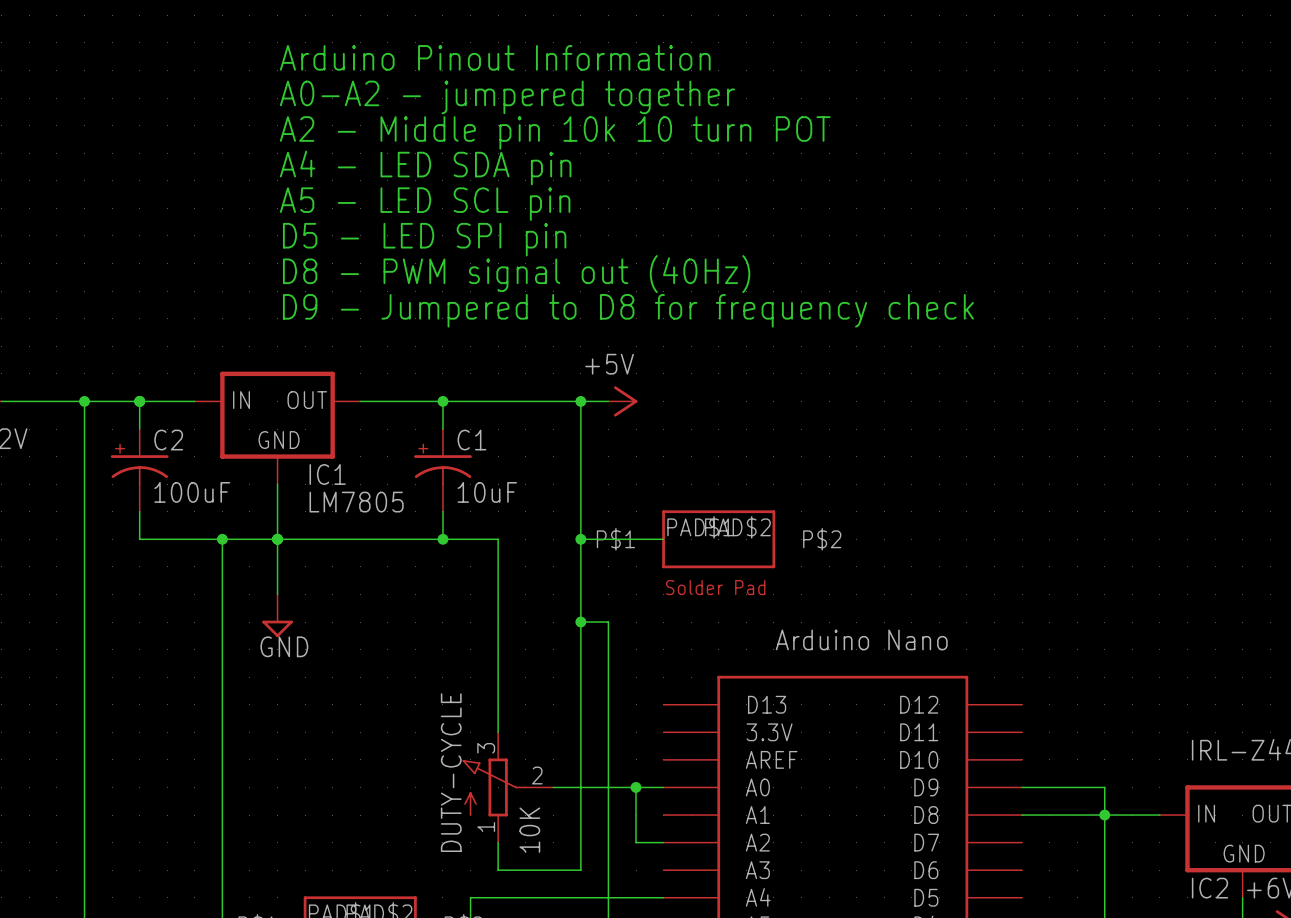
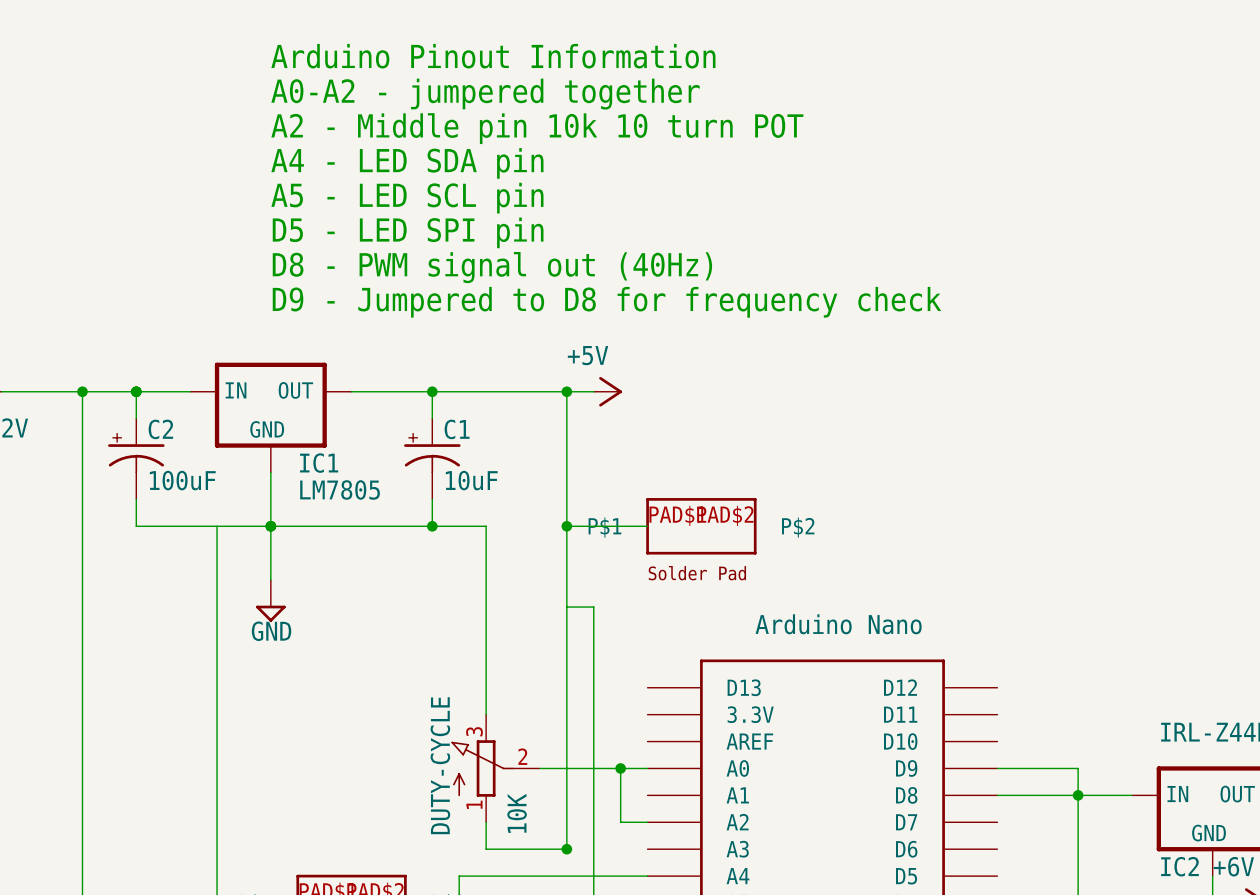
junction: (222, 539) -> none
junction: (580, 622) -> none
junction: none -> (566, 849)

